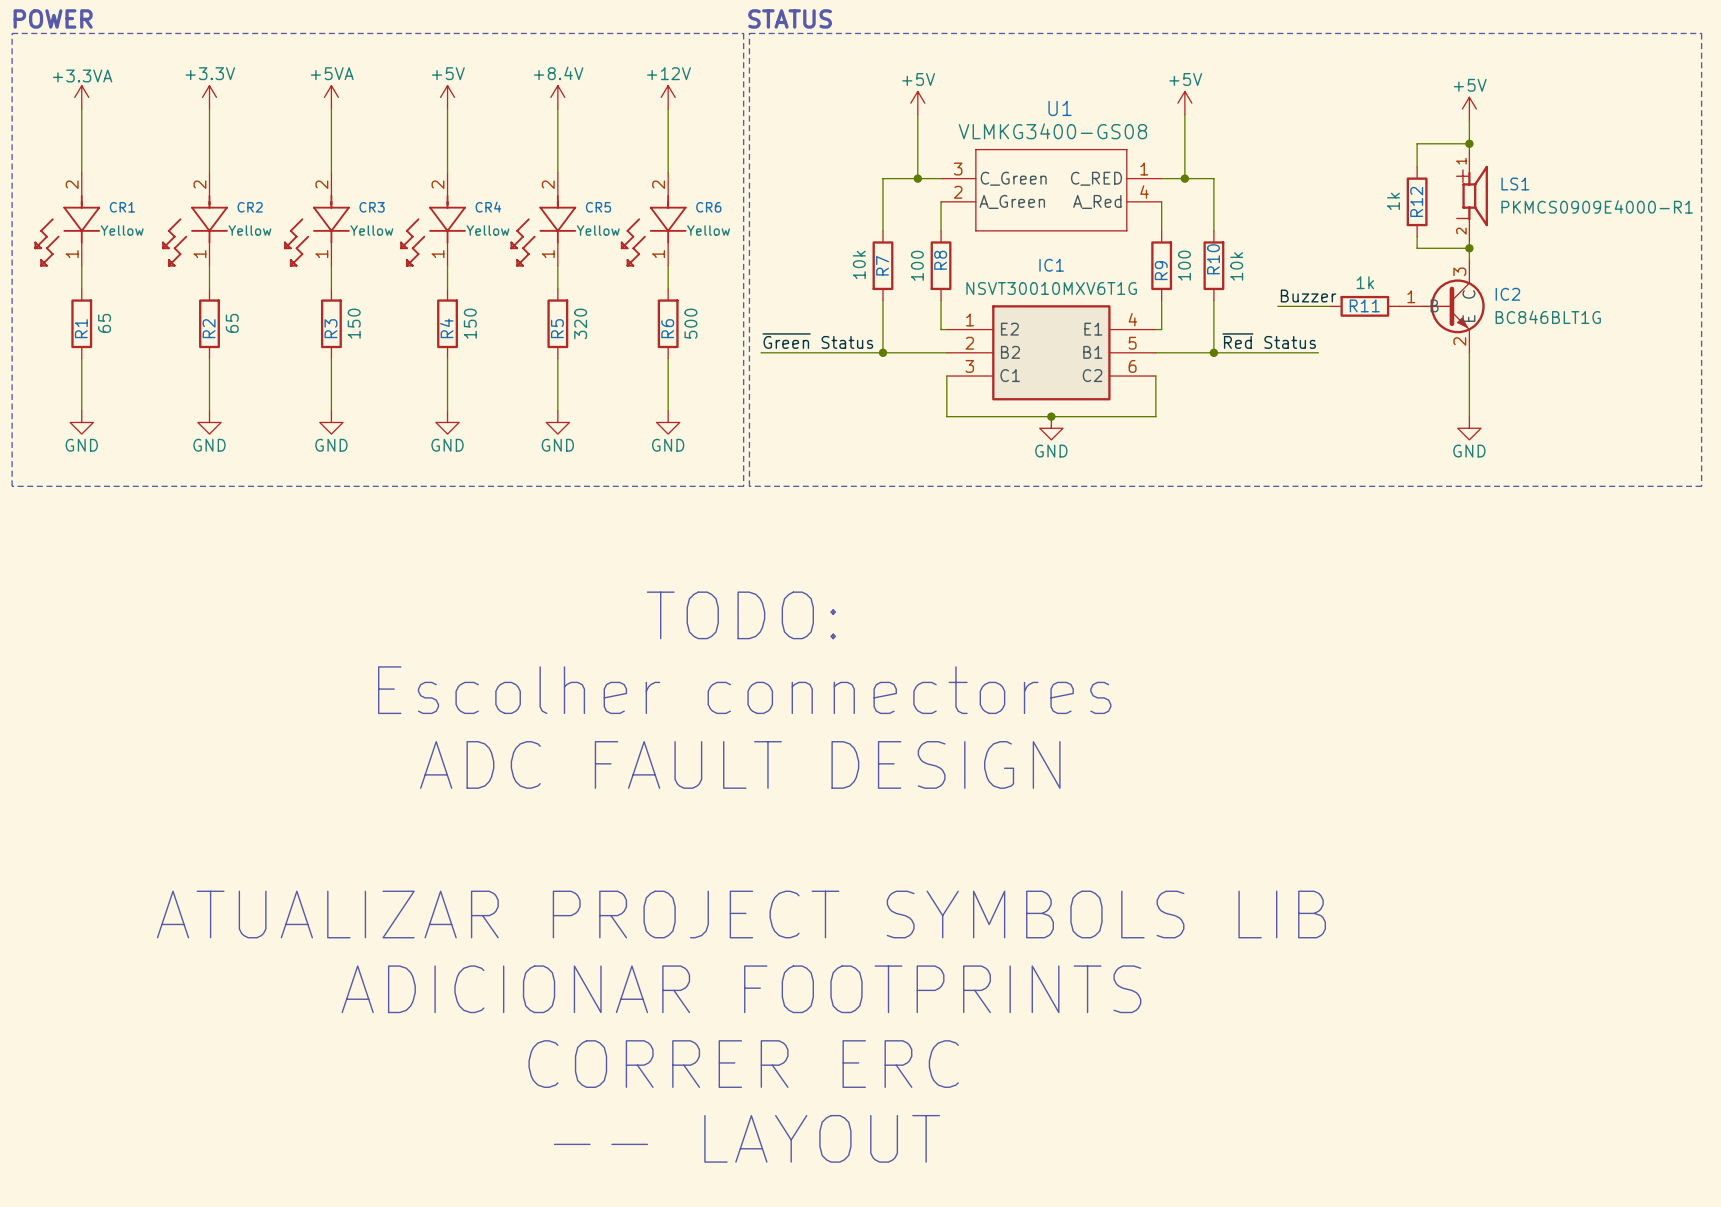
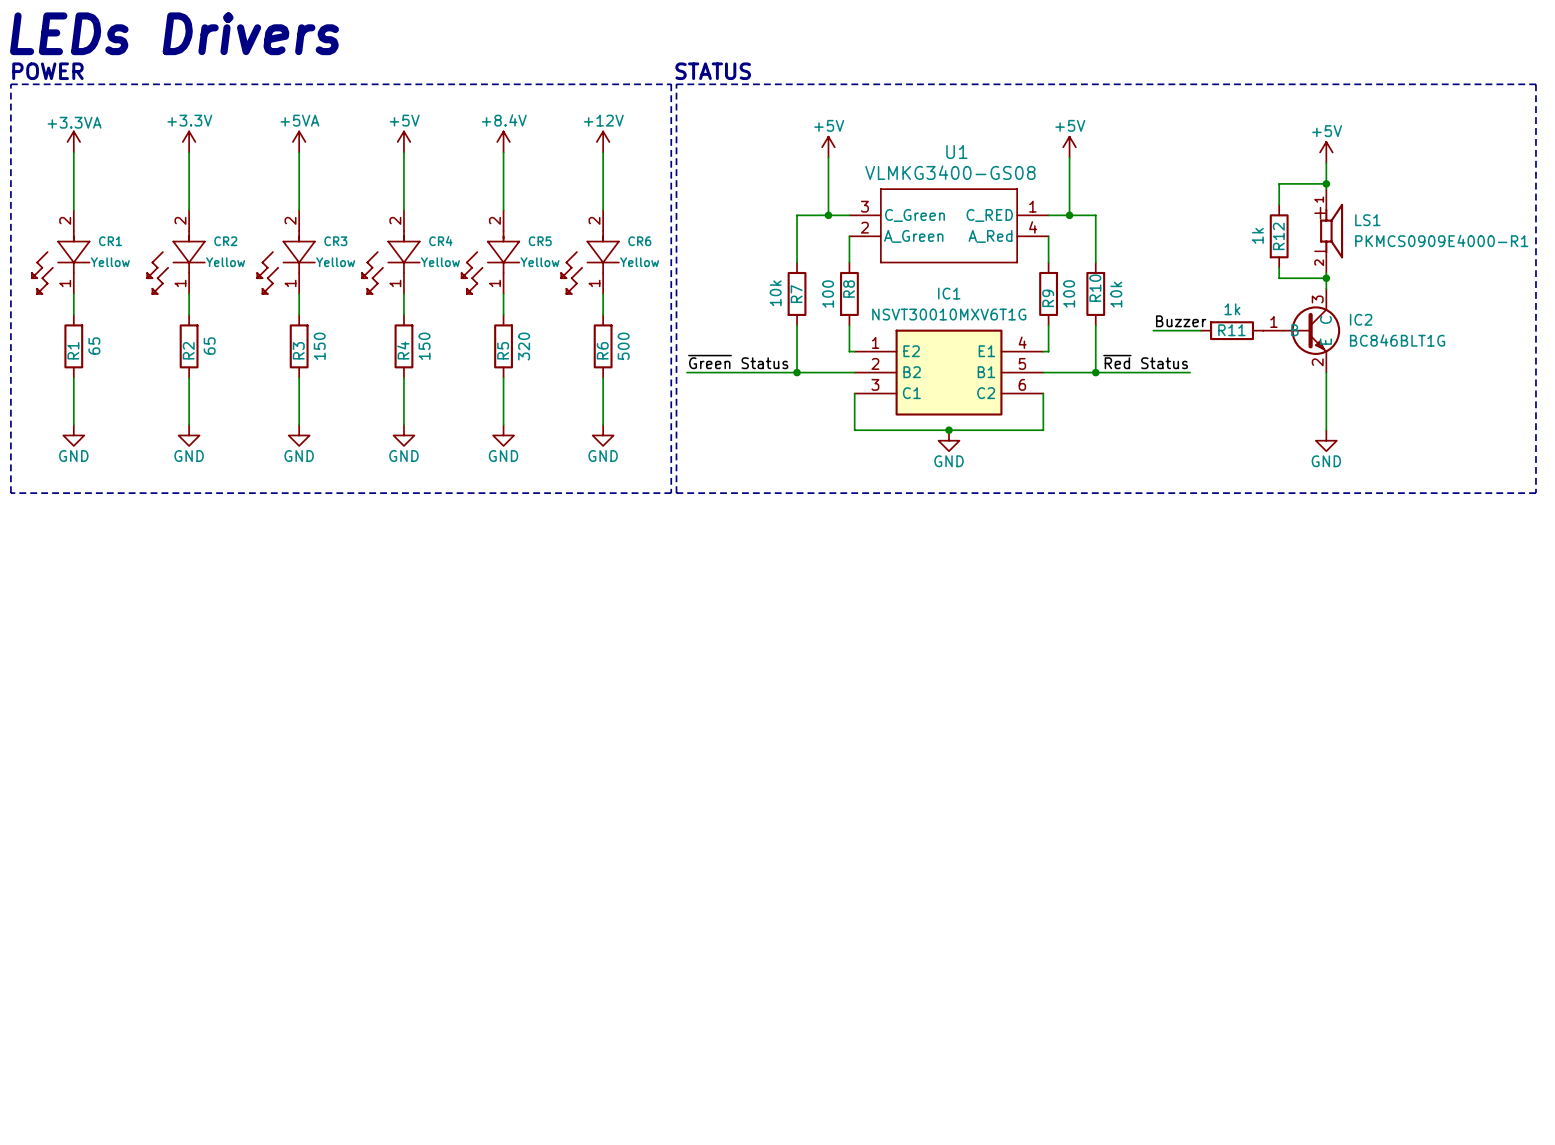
text: TODO: (741, 615) -> none
text: Escolher connectores (744, 690) -> none
text: ADC FAULT DESIGN (740, 764) -> none
text: ATUALIZAR PROJECT SYMBOLS LIB (741, 914) -> none
text: ADICIONAR FOOTPRINTS (741, 989) -> none
text: CORRER ERC (743, 1064) -> none
text: -- LAYOUT (746, 1138) -> none

